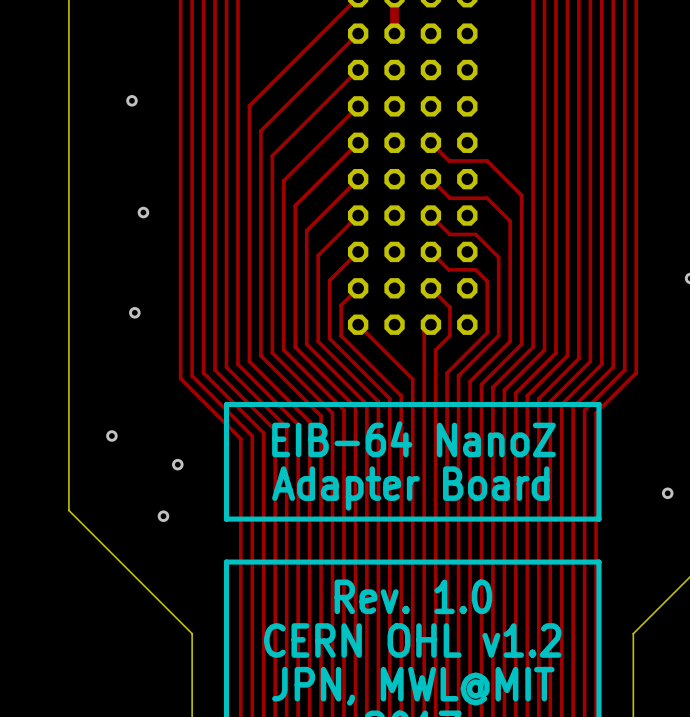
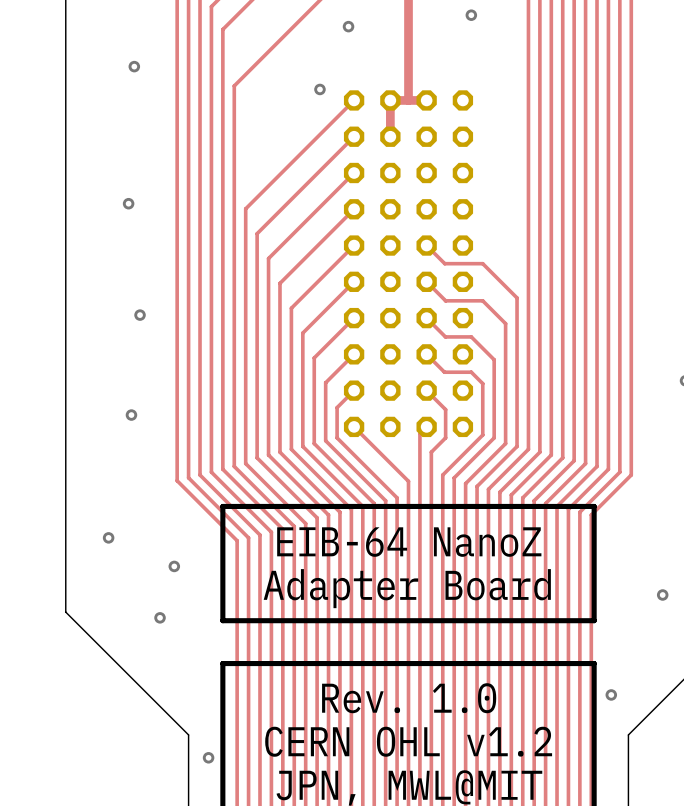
via: none -> (611, 694)
via: none -> (208, 757)

